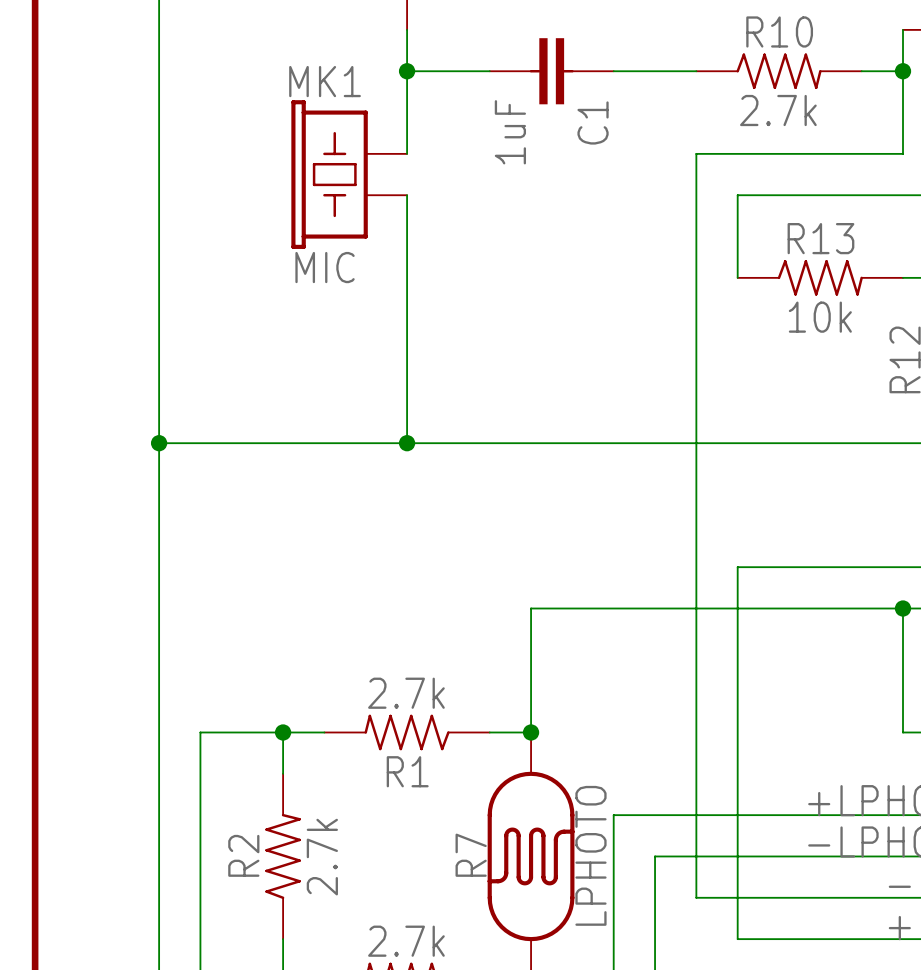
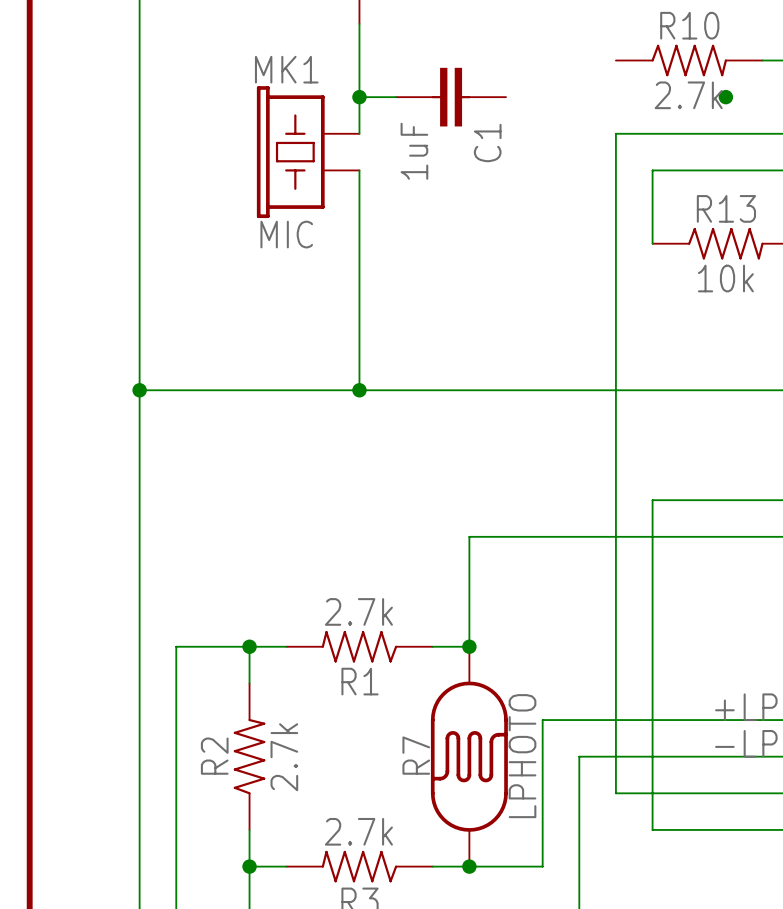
wire: (407, 71) (489, 71) -> none
junction position: (407, 71) -> (359, 97)
C1 position: (551, 71) -> (451, 97)
wire: (613, 71) (696, 71) -> none
wire: none -> (359, 97) (396, 97)
junction: none -> (725, 97)

